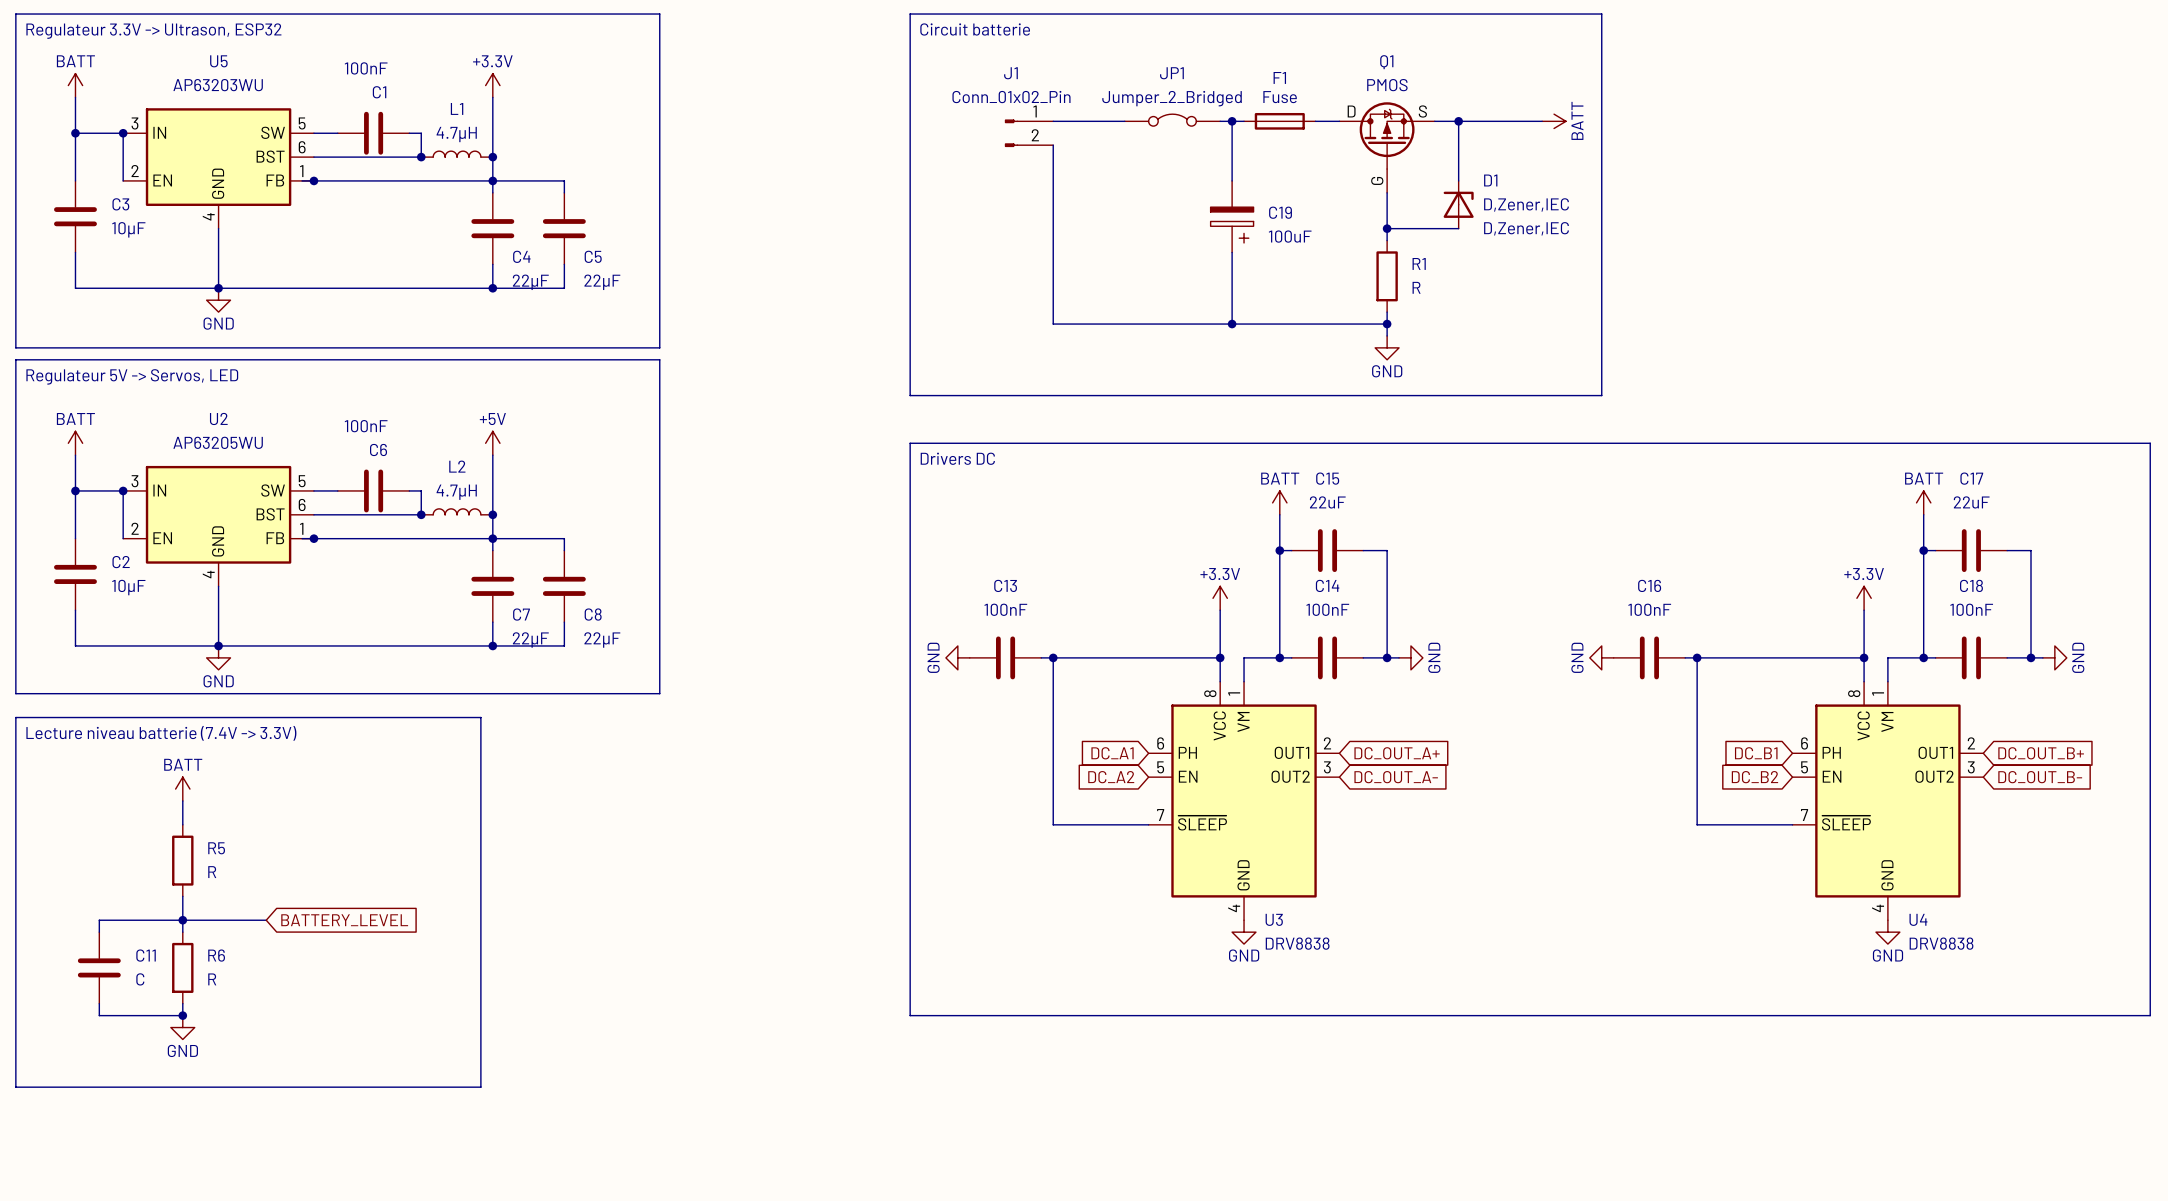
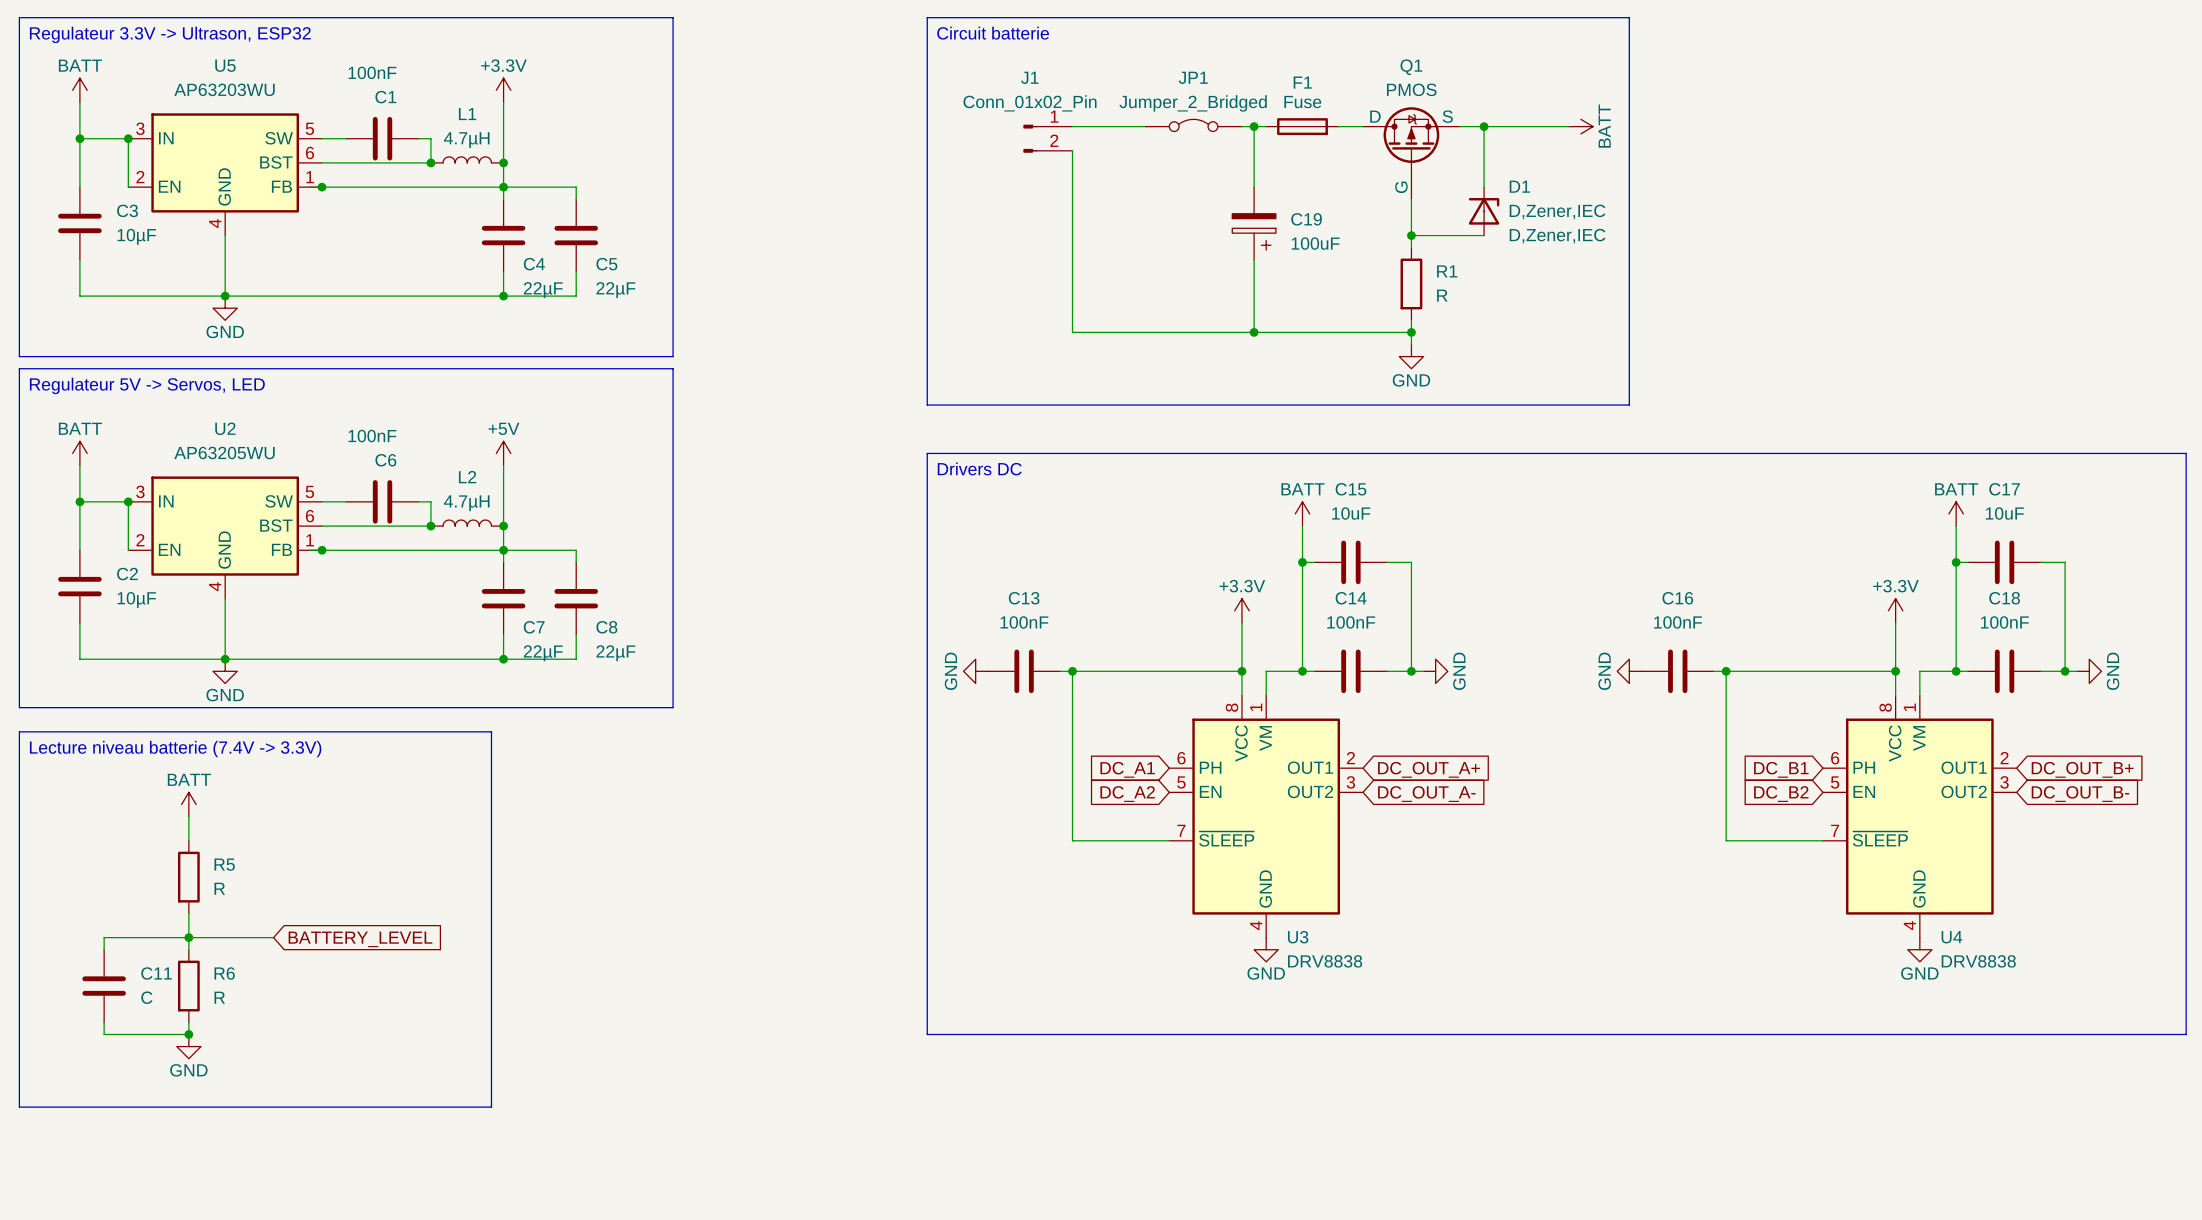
C15 value: 22uF (1327, 502) -> 10uF (1351, 513)
C17 value: 22uF (1971, 502) -> 10uF (2004, 513)

